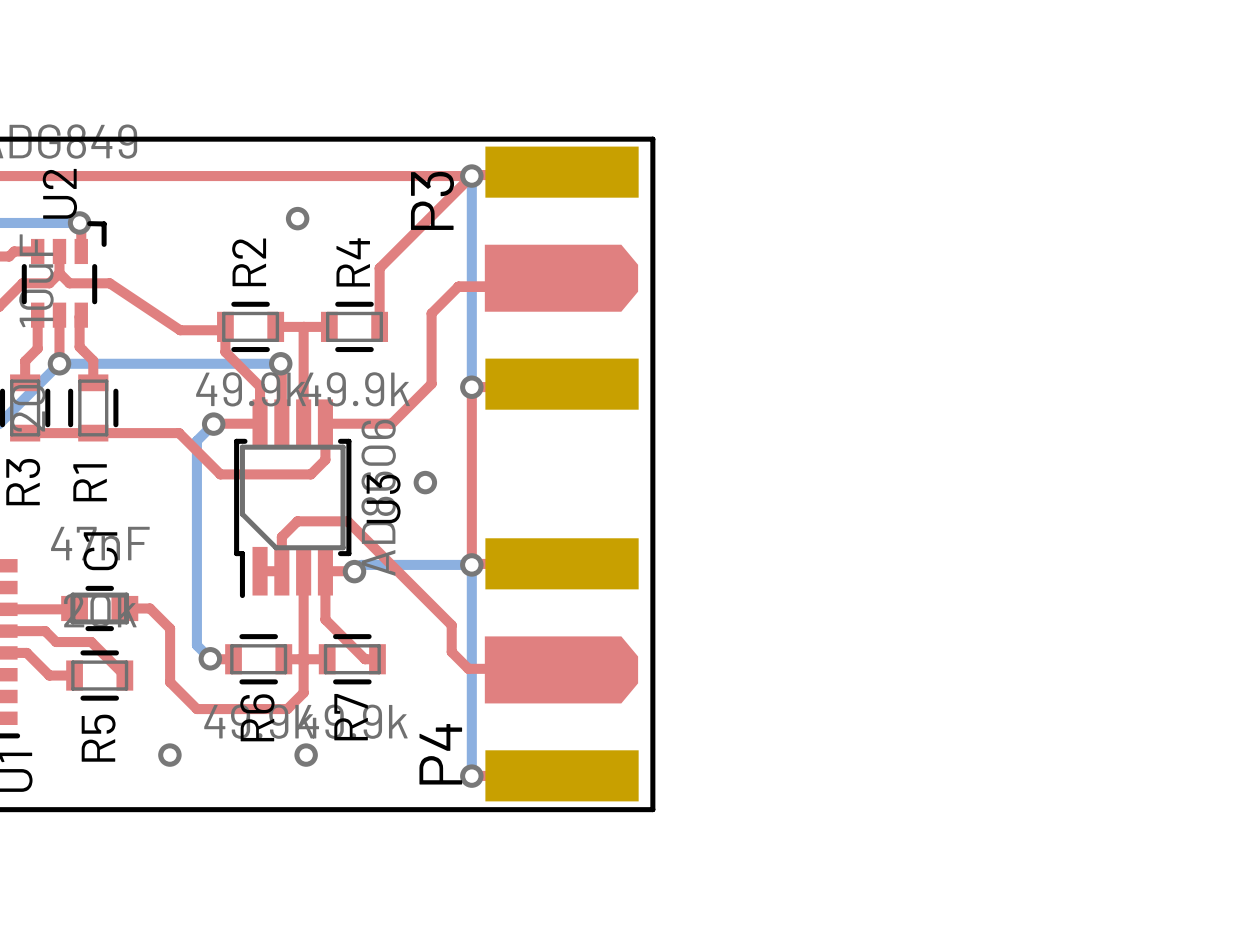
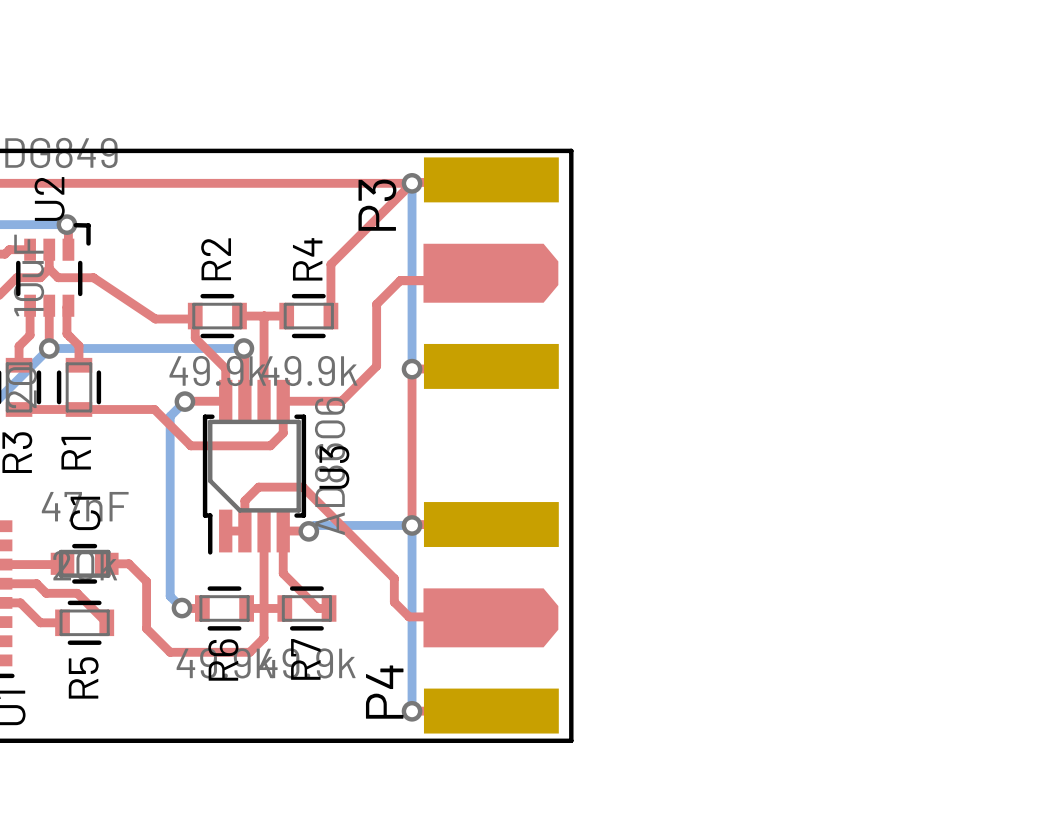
via: (297, 218) -> none
via: (425, 482) -> none
via: (169, 755) -> none
via: (306, 755) -> none

